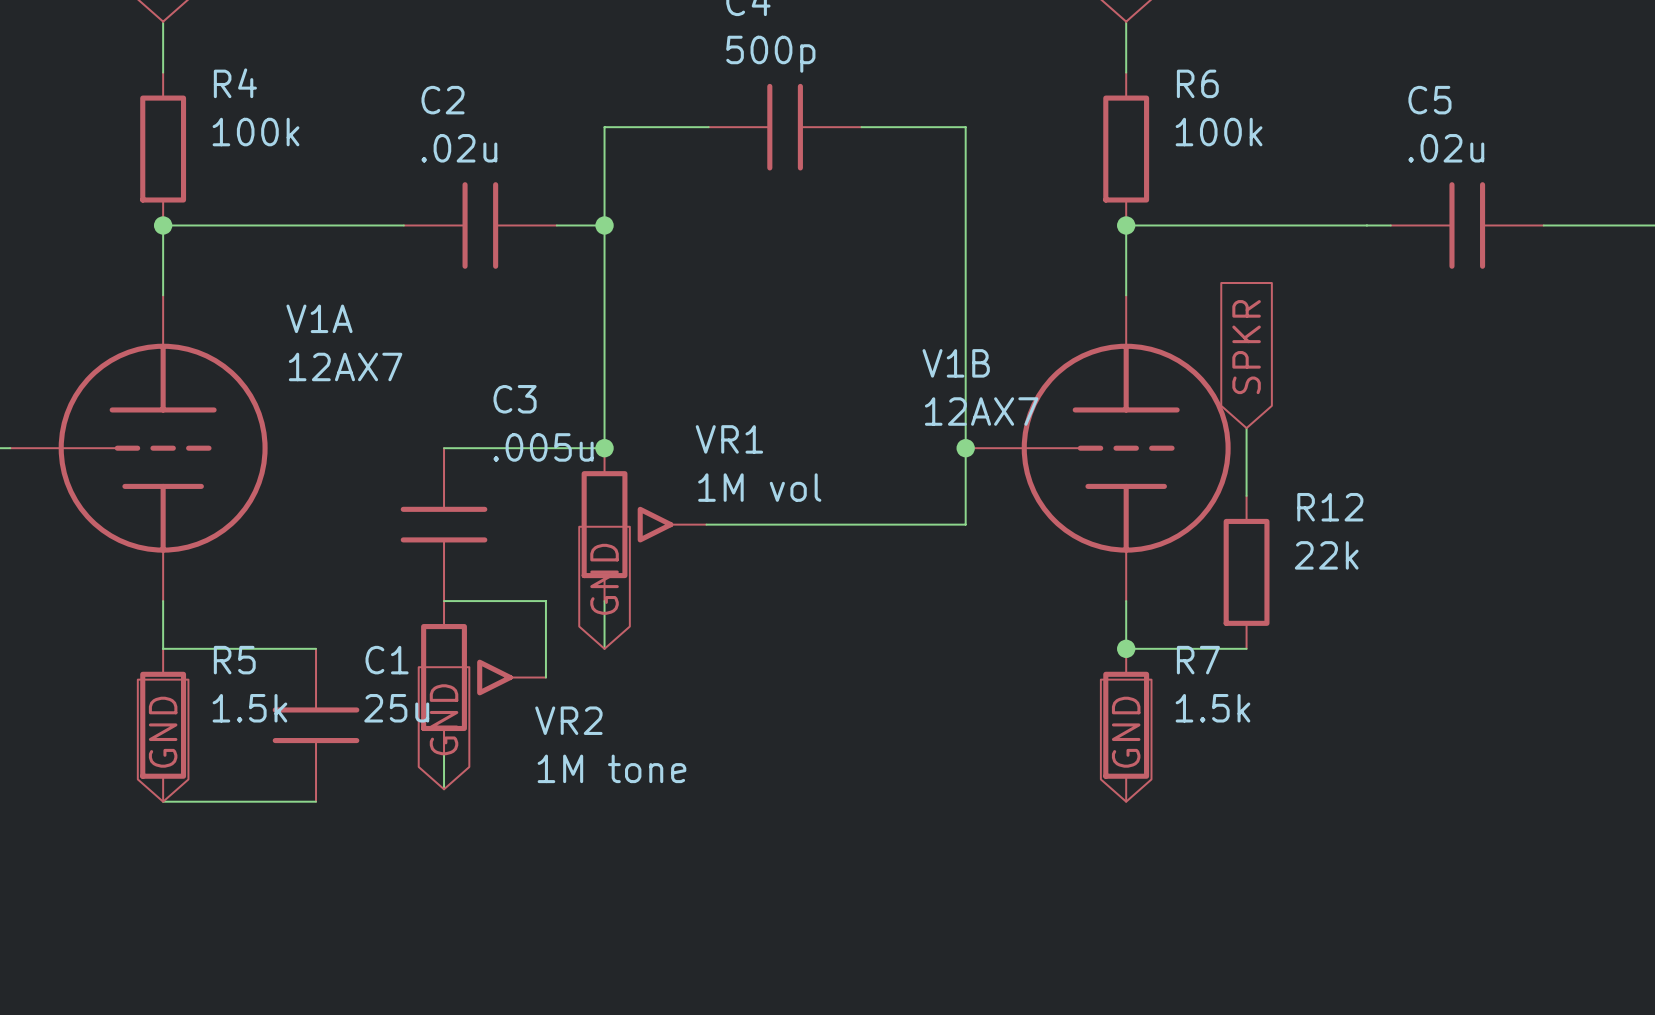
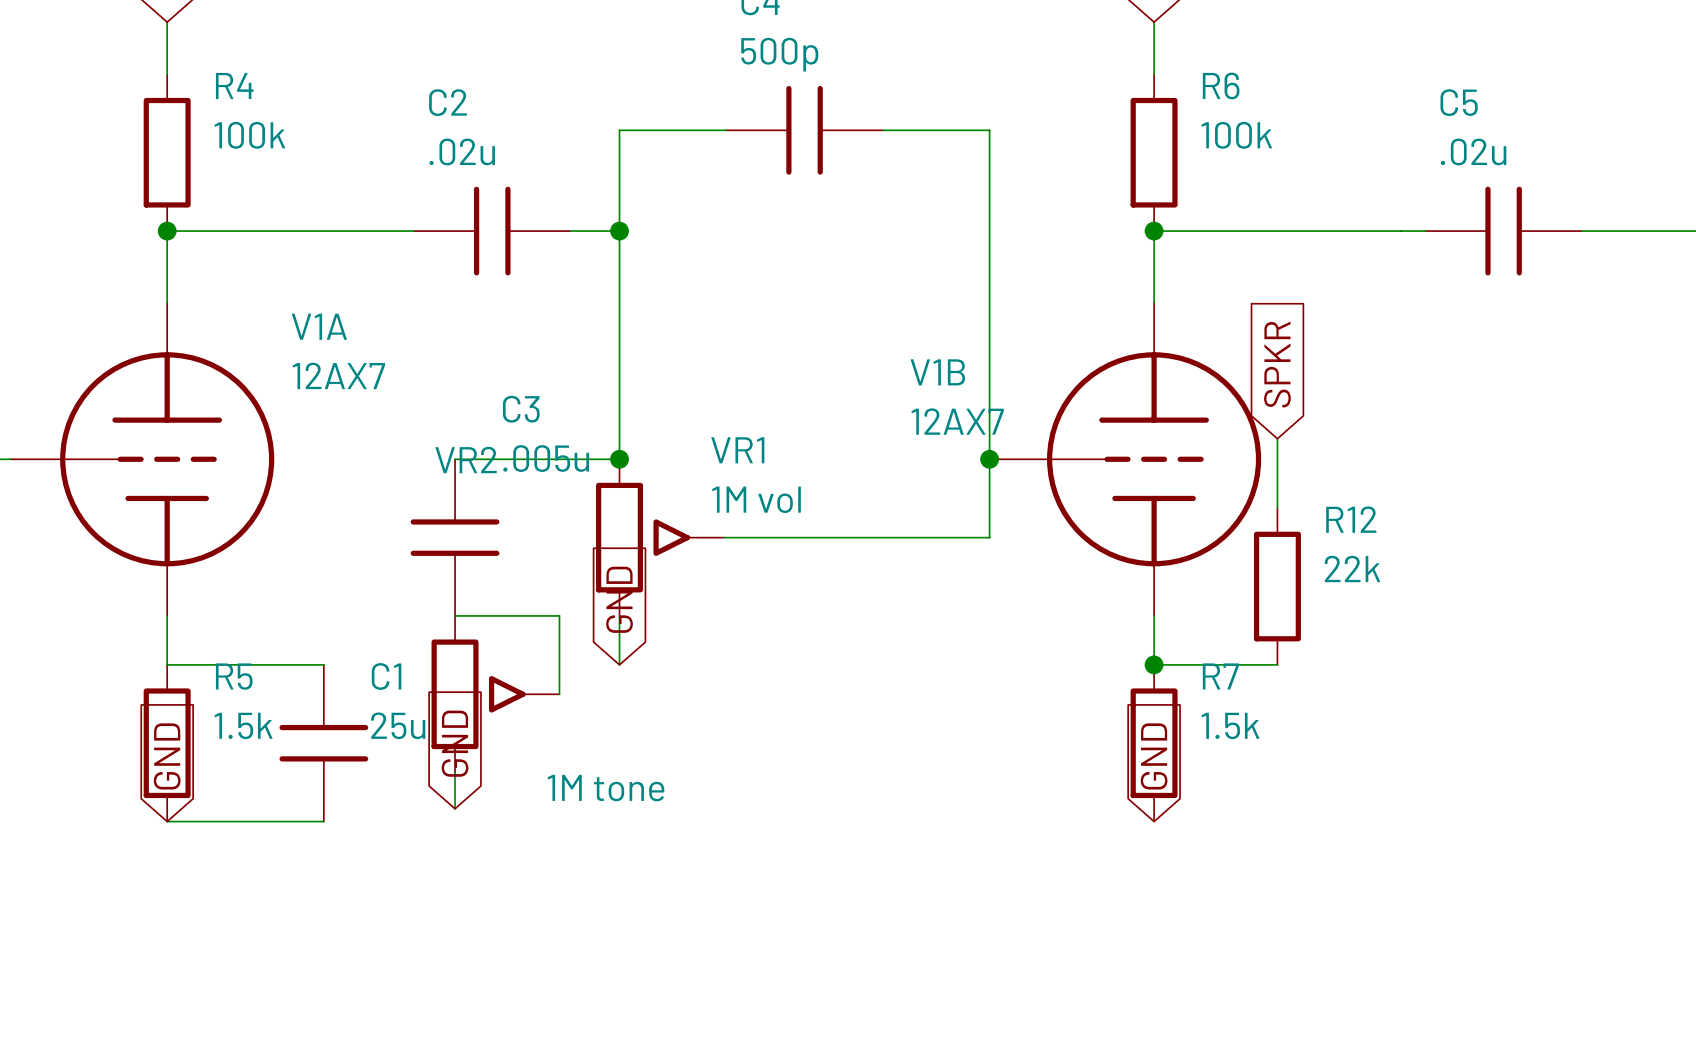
V1B name position: V1B (956, 363) -> V1B (937, 372)
V1B value position: 12AX7 (981, 411) -> 12AX7 (957, 421)
VR2 name position: VR2 (568, 720) -> VR2 (466, 460)

